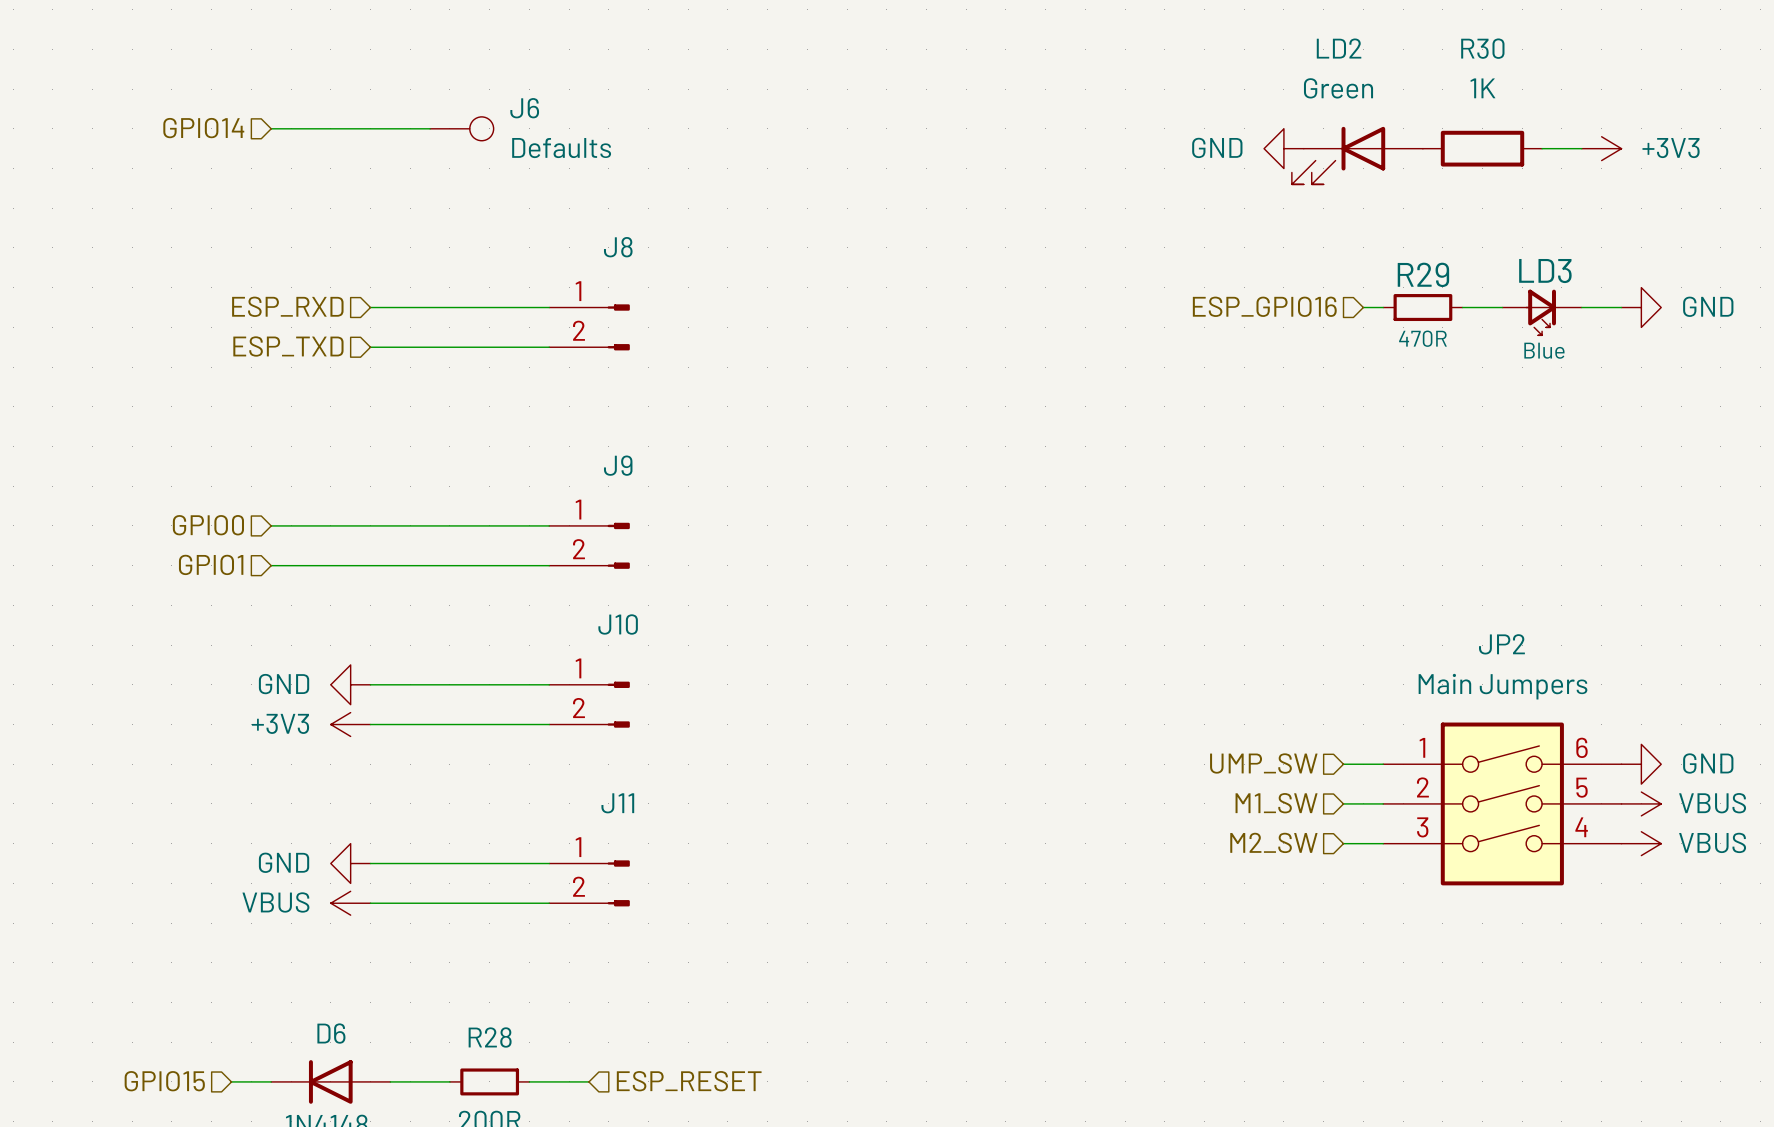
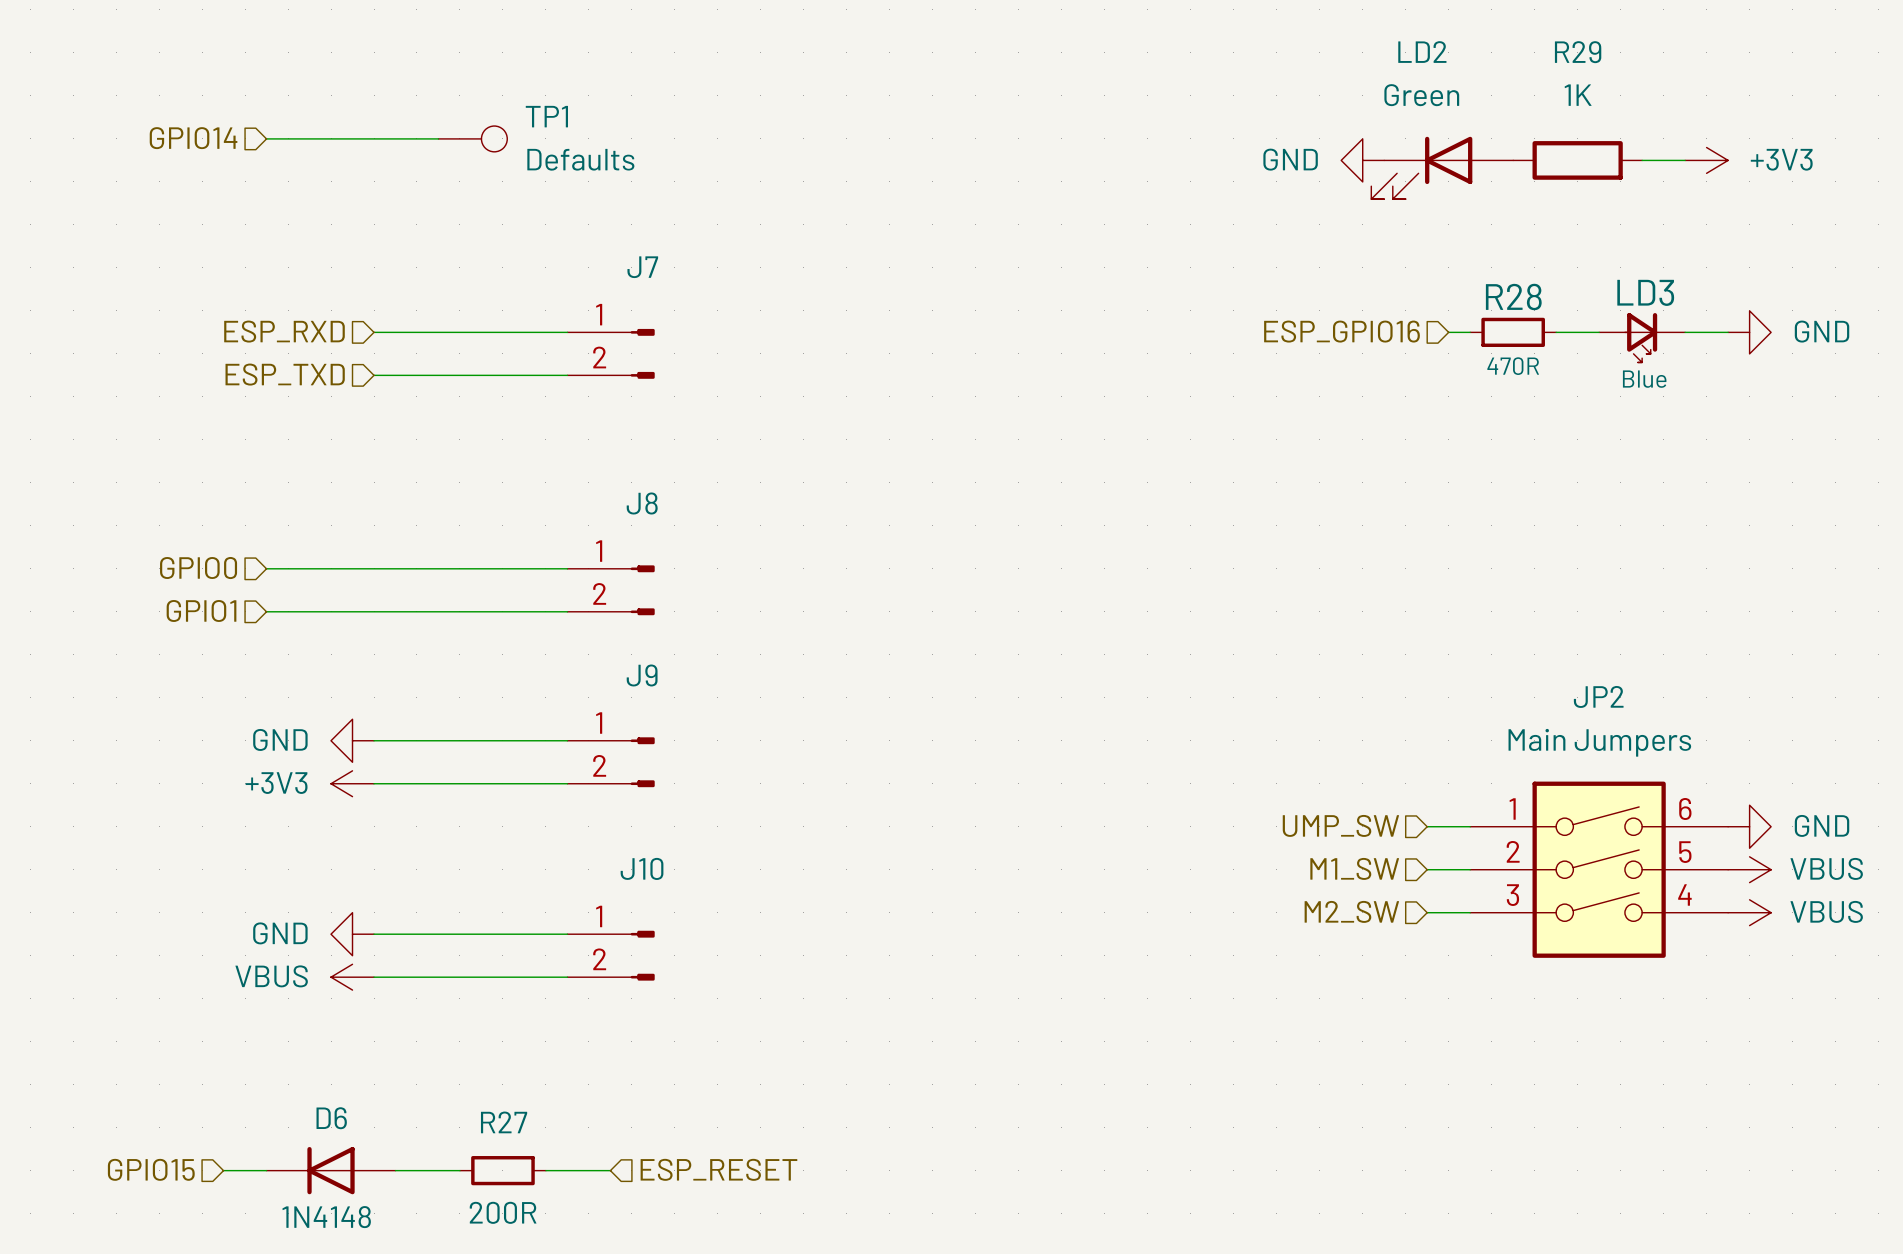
R30 name: R30 (1482, 48) -> R29 (1578, 52)
J6 name: J6 (524, 108) -> TP1 (546, 116)
J8 name: J8 (618, 247) -> J7 (642, 267)
R29 name: R29 (1423, 274) -> R28 (1513, 296)
J9 name: J9 (618, 465) -> J8 (642, 503)
J10 name: J10 (618, 624) -> J9 (642, 675)
J11 name: J11 (617, 803) -> J10 (642, 868)
R28 name: R28 (490, 1037) -> R27 (504, 1122)

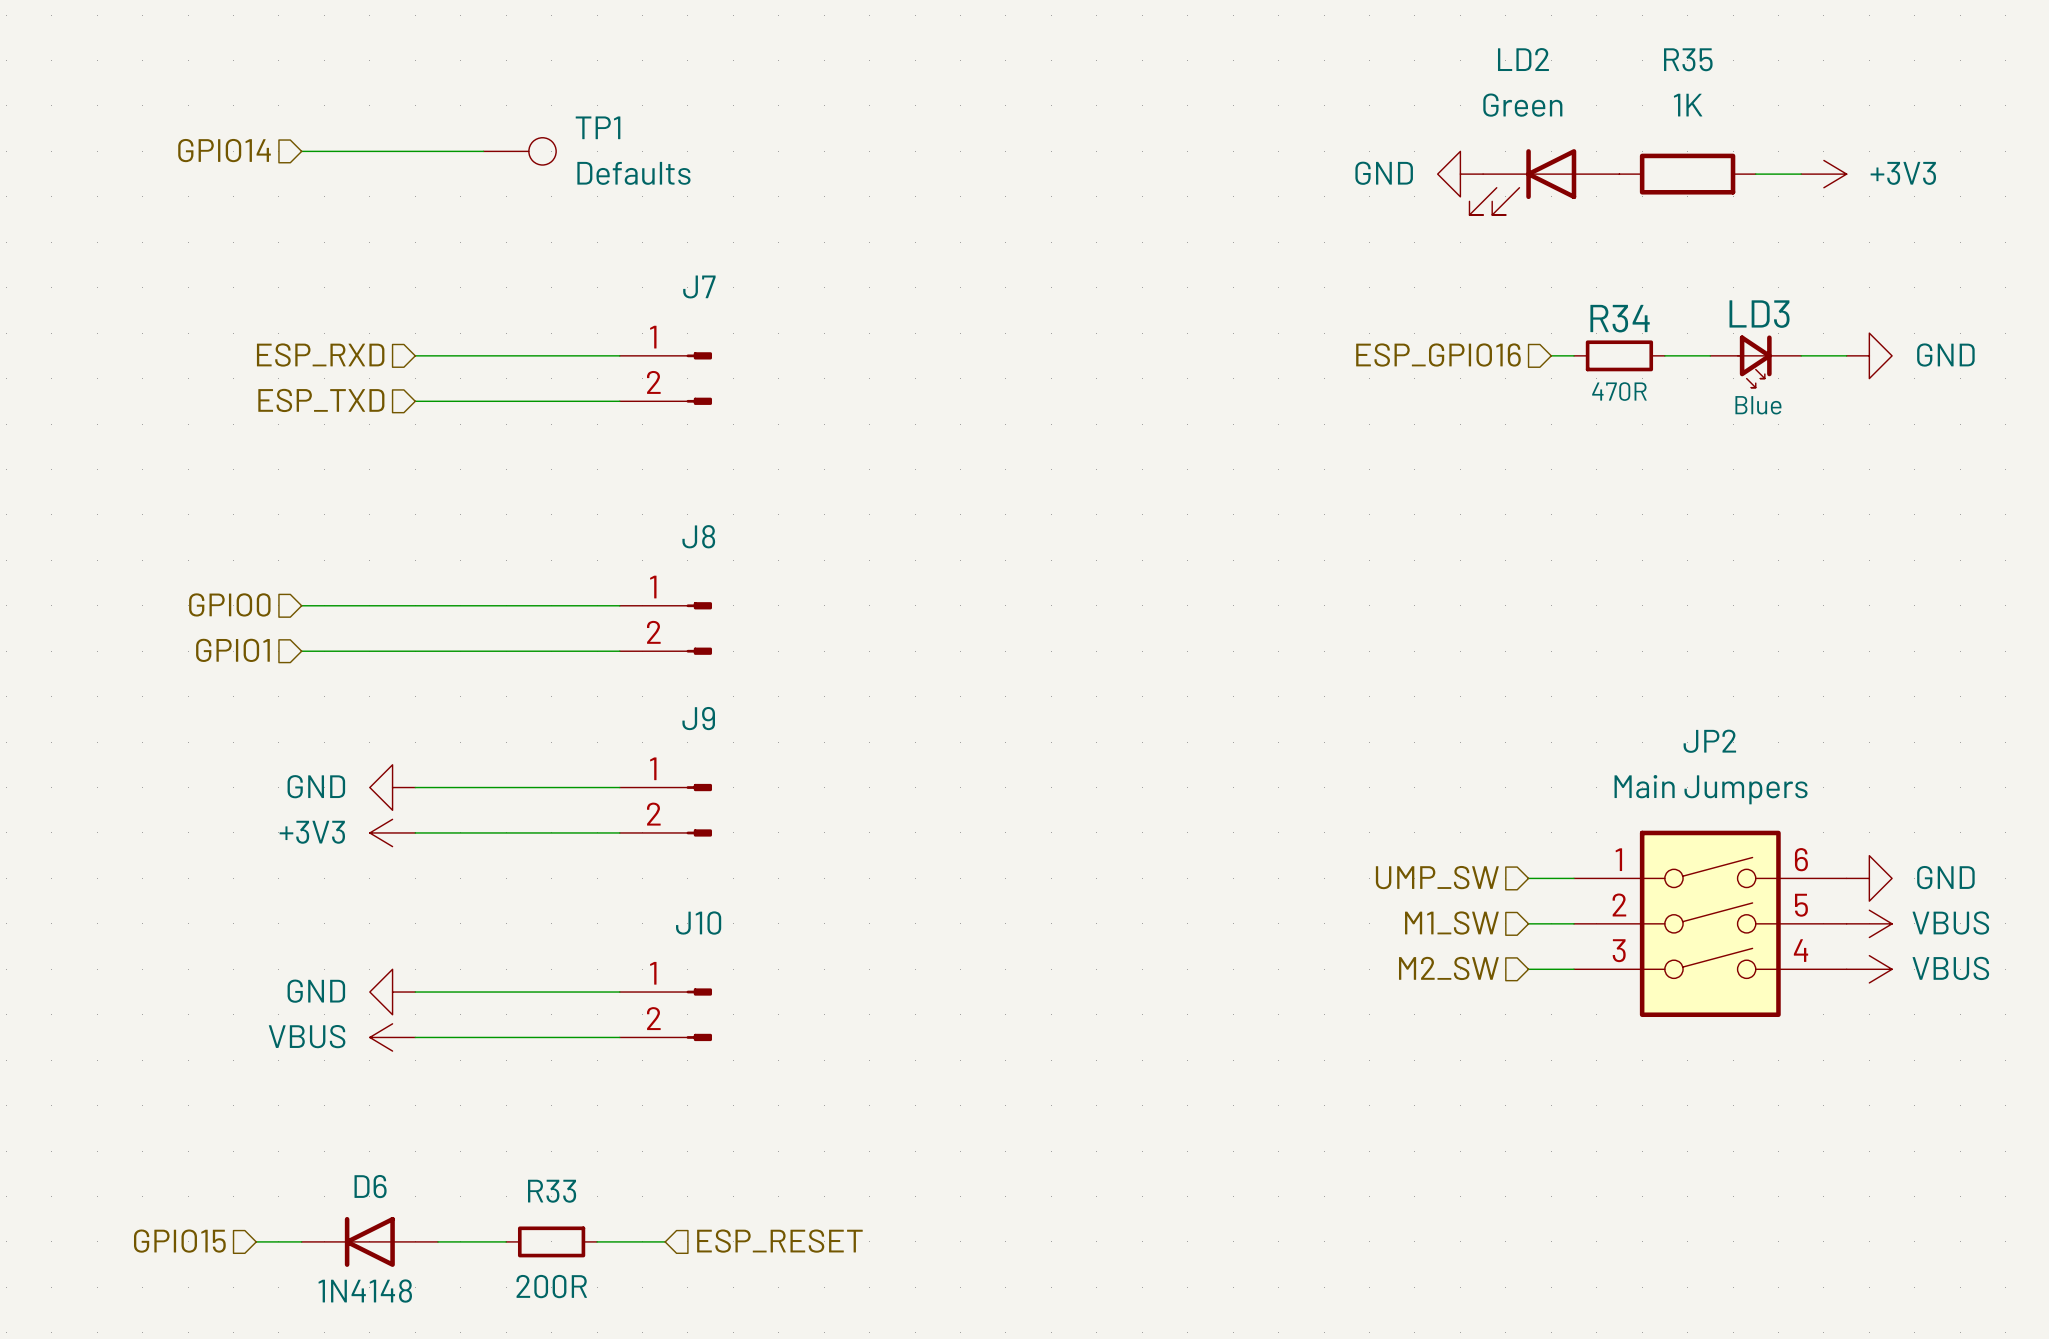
R29 name: R29 (1578, 52) -> R35 (1688, 59)
R28 name: R28 (1513, 296) -> R34 (1620, 318)
R27 name: R27 (504, 1122) -> R33 (552, 1191)

